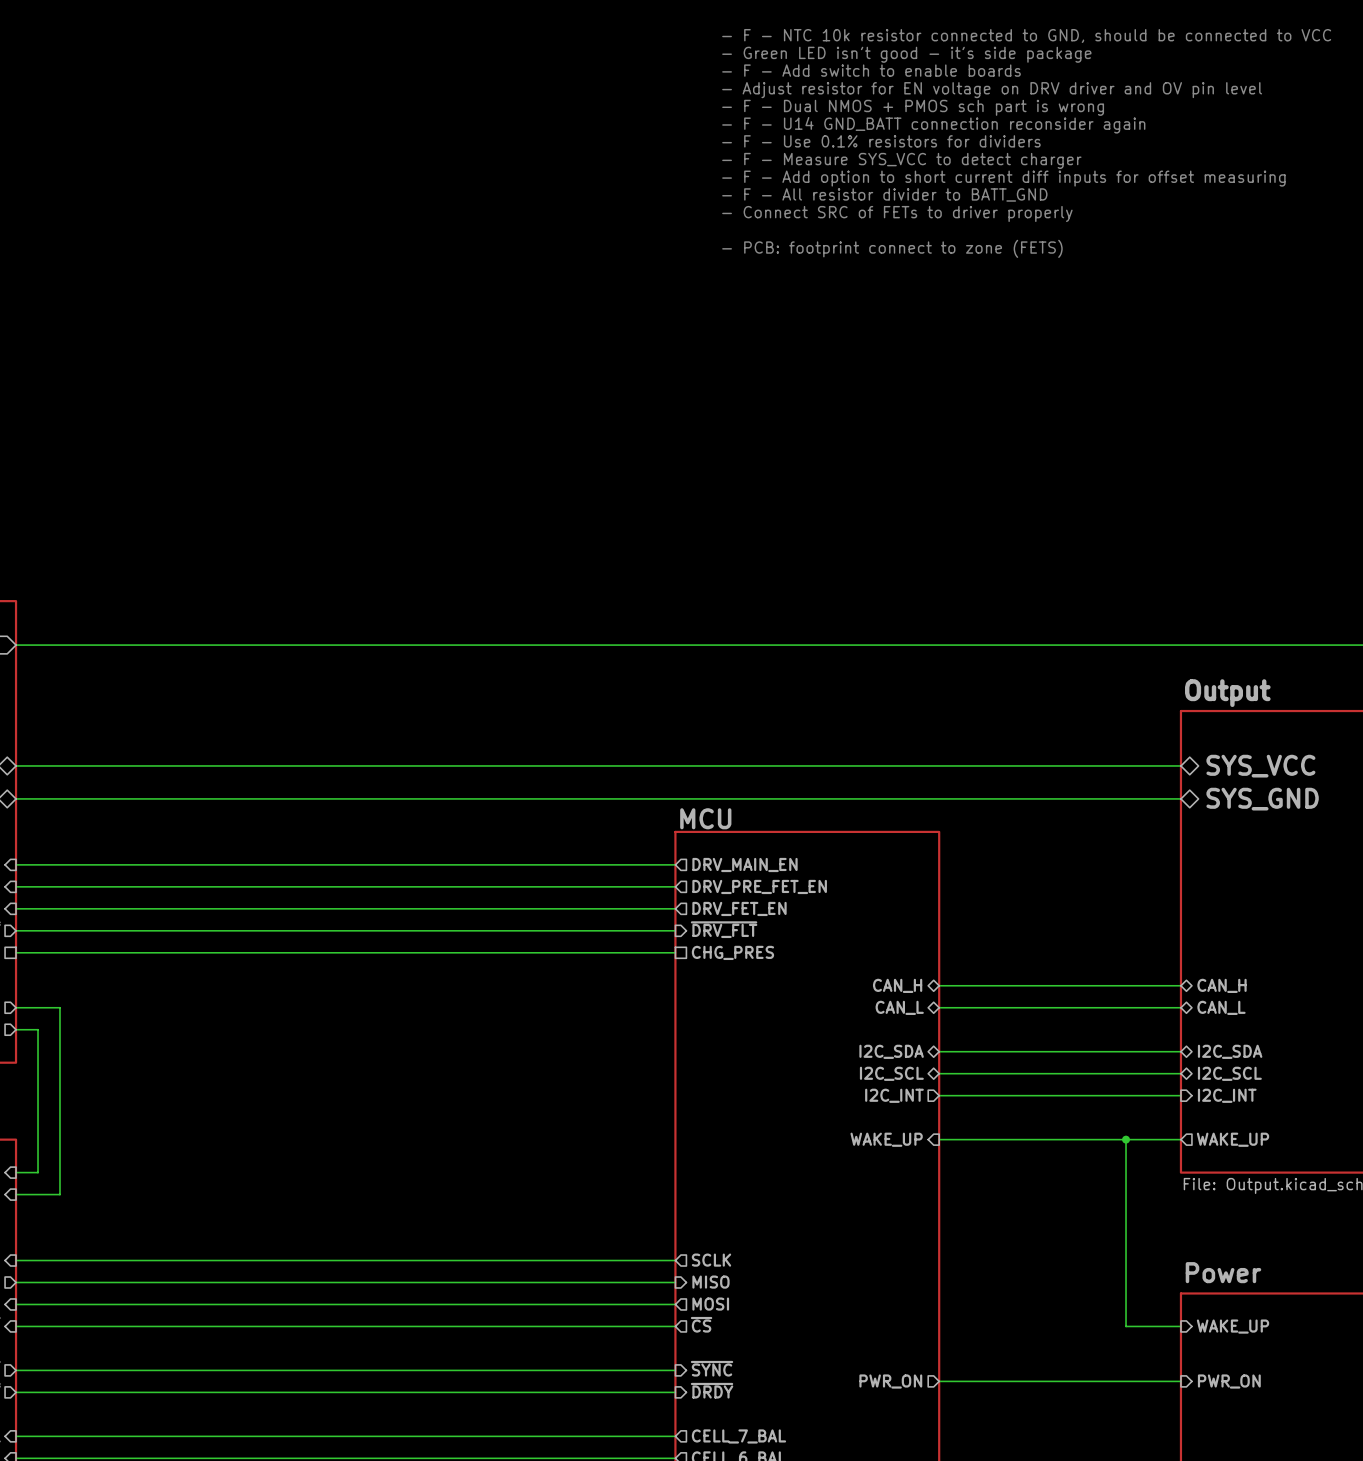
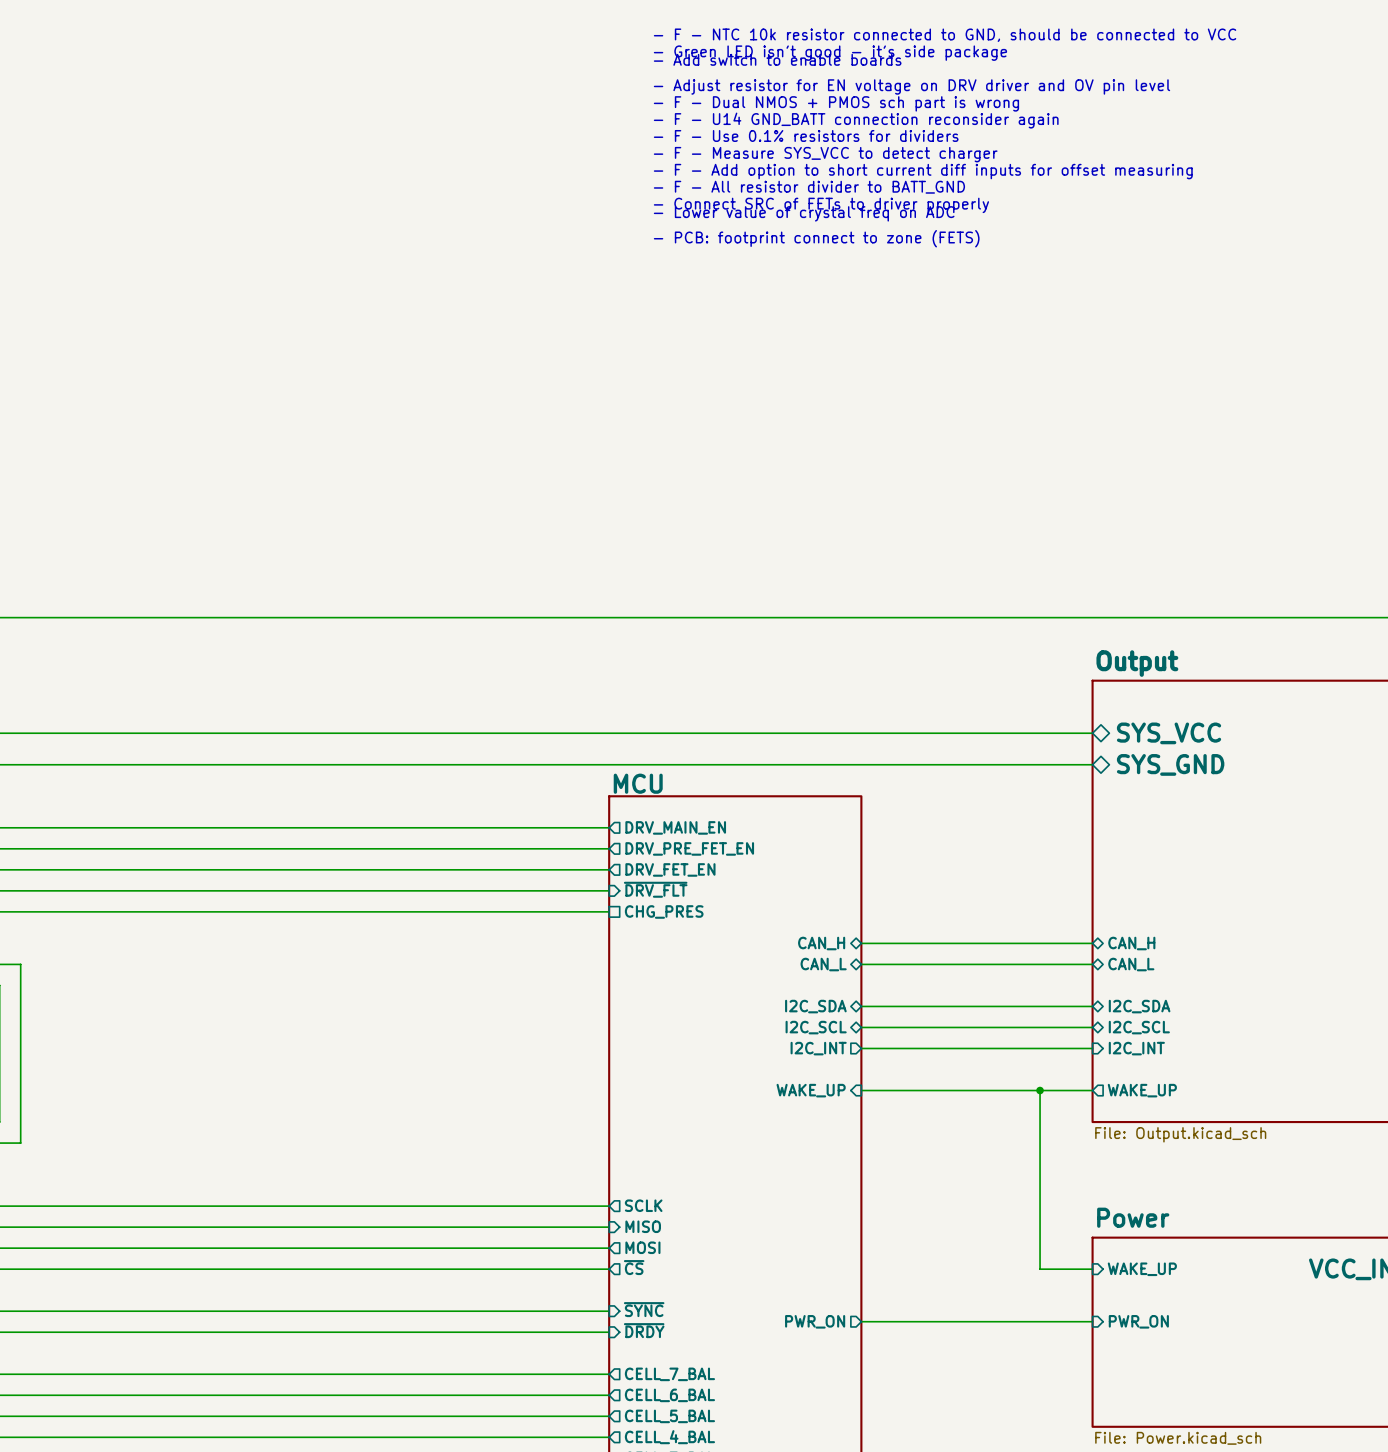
text: - F - Add switch to enable boards (871, 70) -> - Add switch to enable boards (777, 59)
text: none -> - Lower value of crystal freq on ADC (804, 213)

